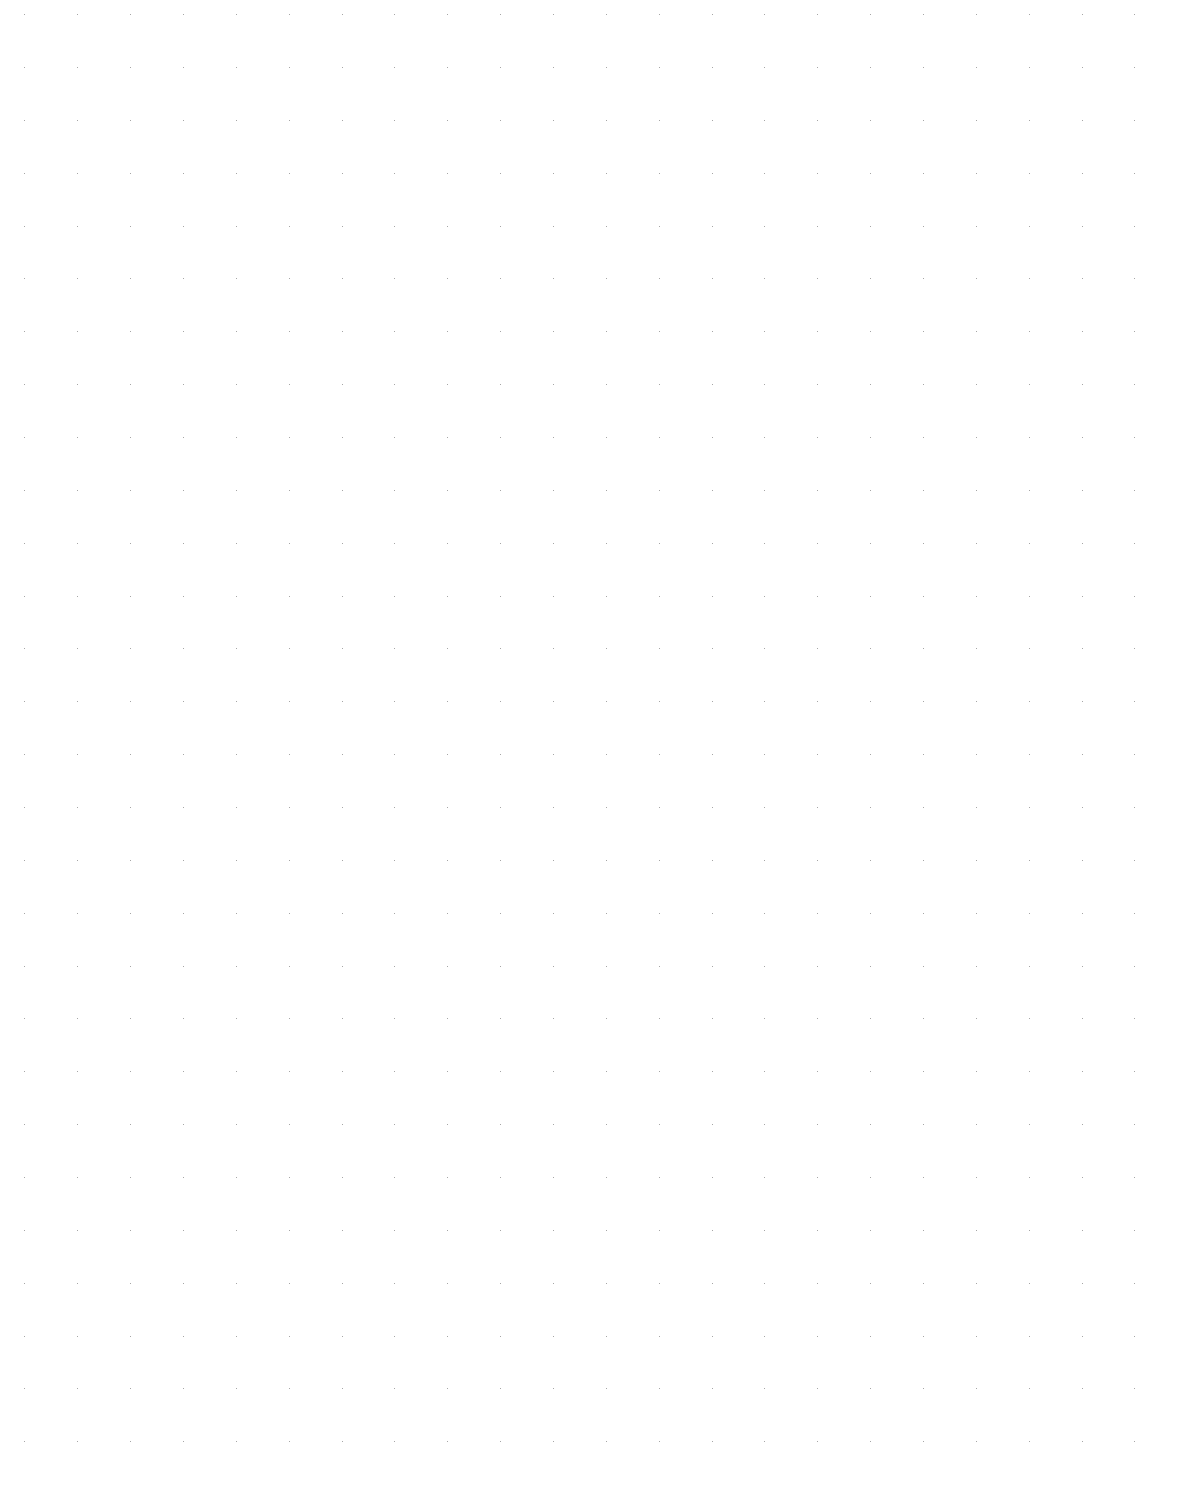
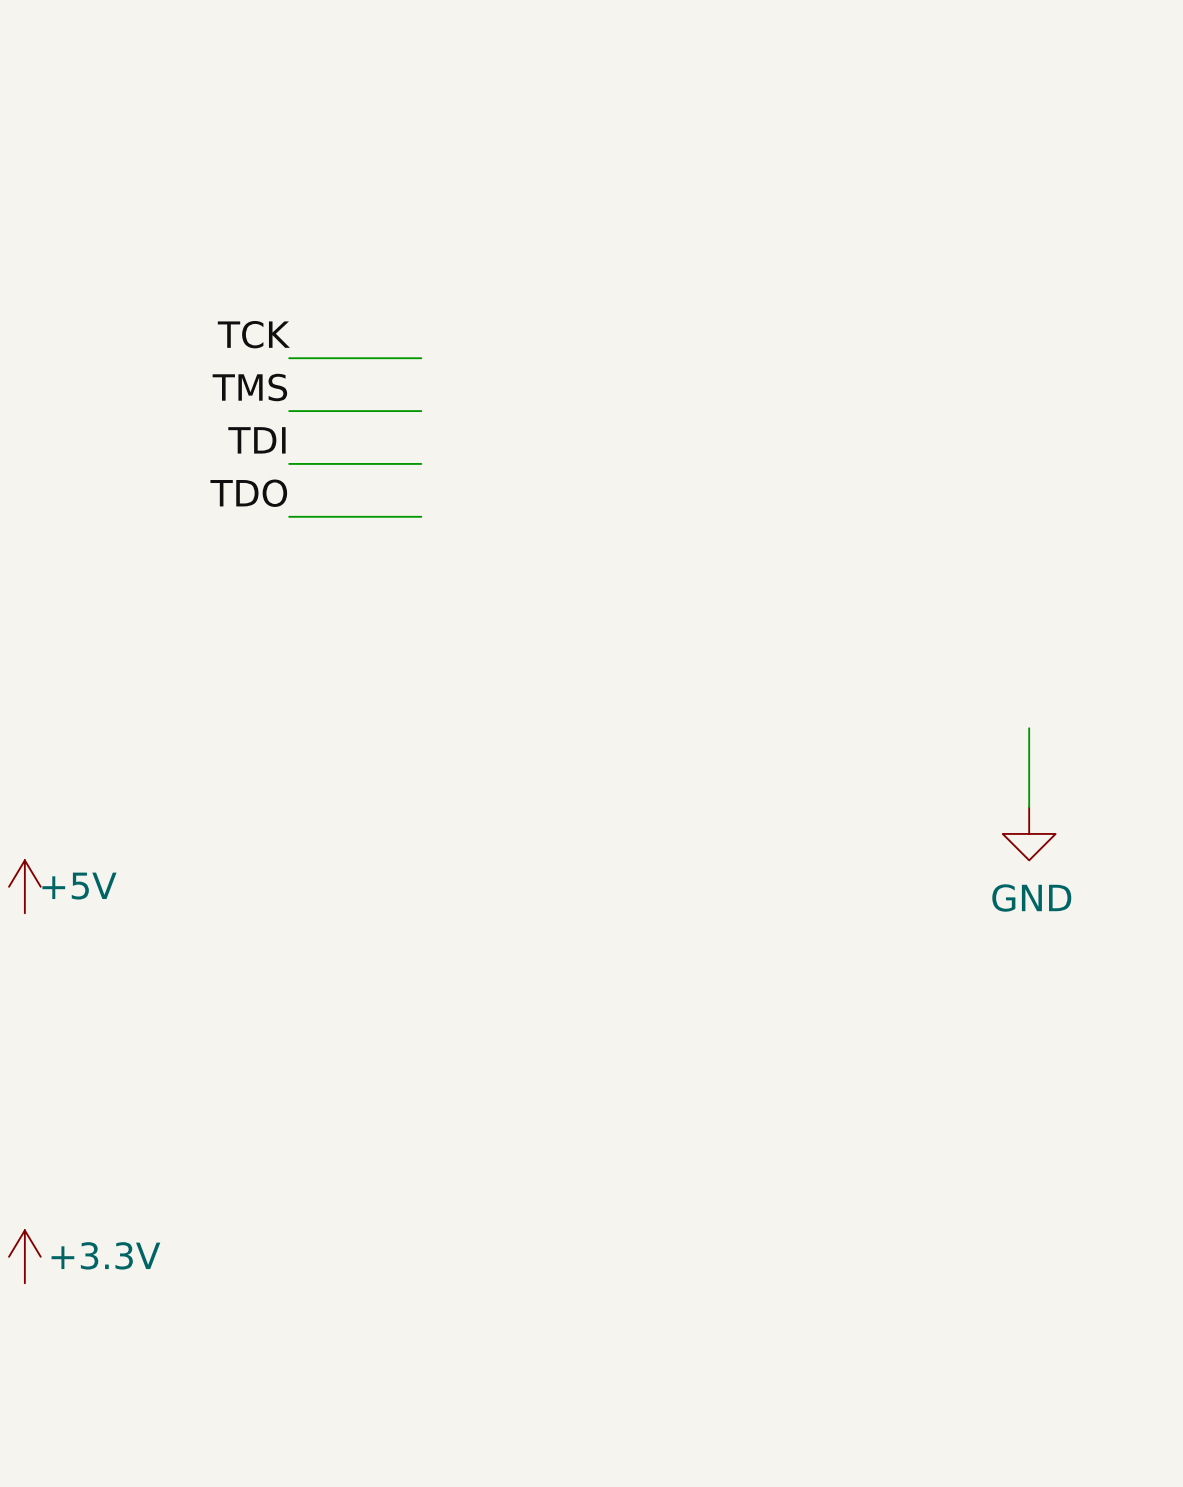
label: none -> TCK (253, 334)
wire: none -> (289, 358) (421, 358)
label: none -> TMS (249, 387)
wire: none -> (289, 411) (421, 411)
label: none -> TDI (256, 440)
wire: none -> (289, 463) (421, 463)
label: none -> TDO (248, 493)
wire: none -> (289, 516) (421, 516)
wire: none -> (1029, 728) (1029, 807)
power symbol: none -> GND (1029, 833)
power symbol: none -> +5V (24, 886)
power symbol: none -> +3.3V (24, 1256)

